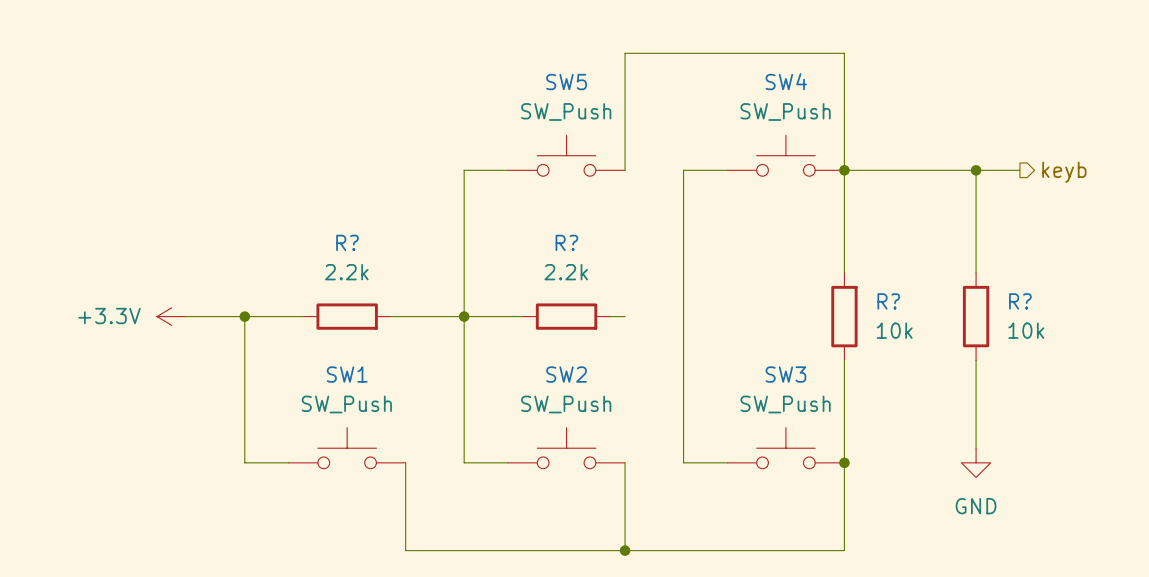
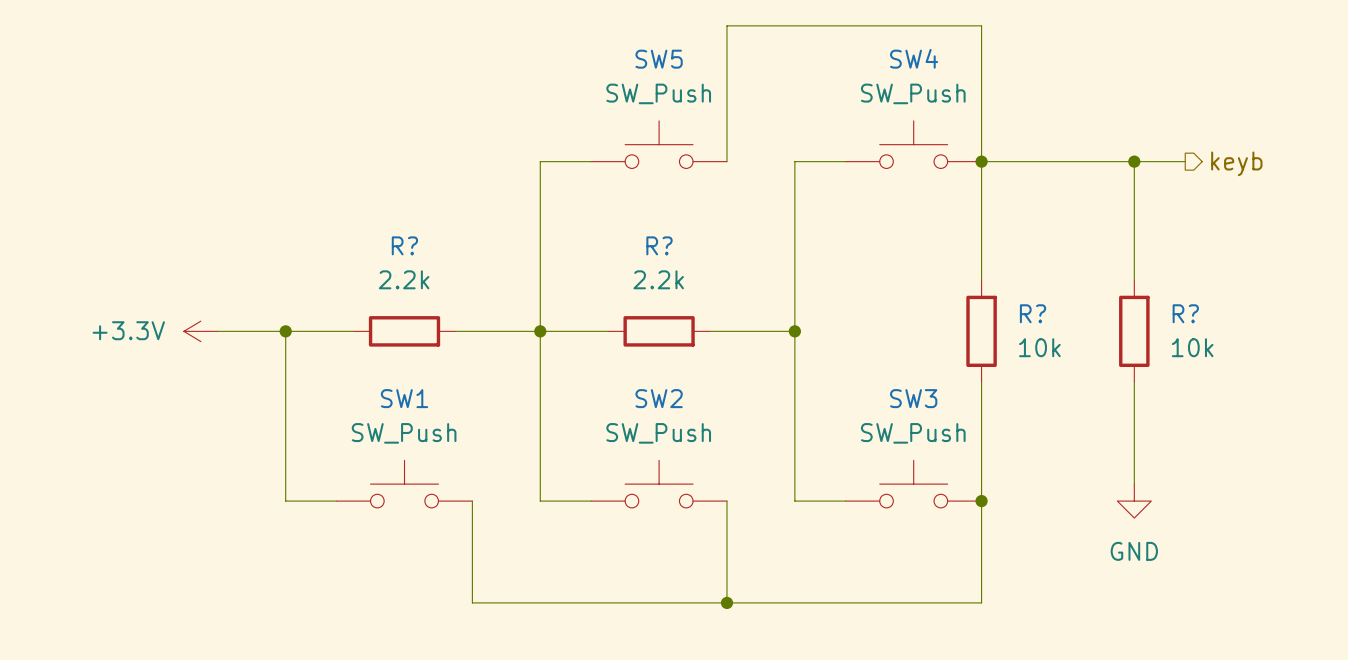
wire: none -> (726, 331) (794, 331)
junction: none -> (794, 331)

